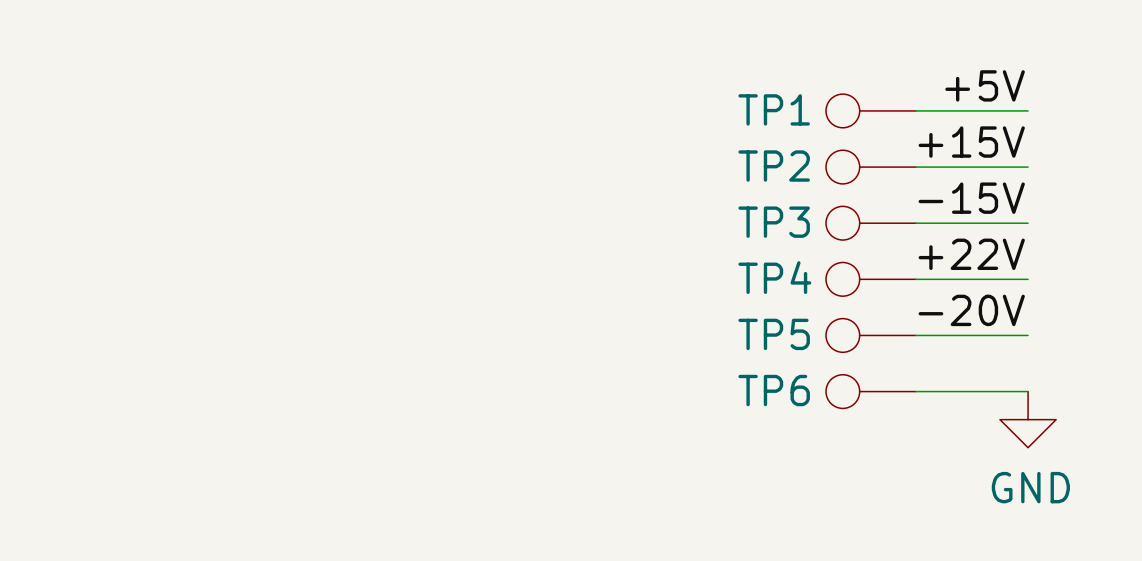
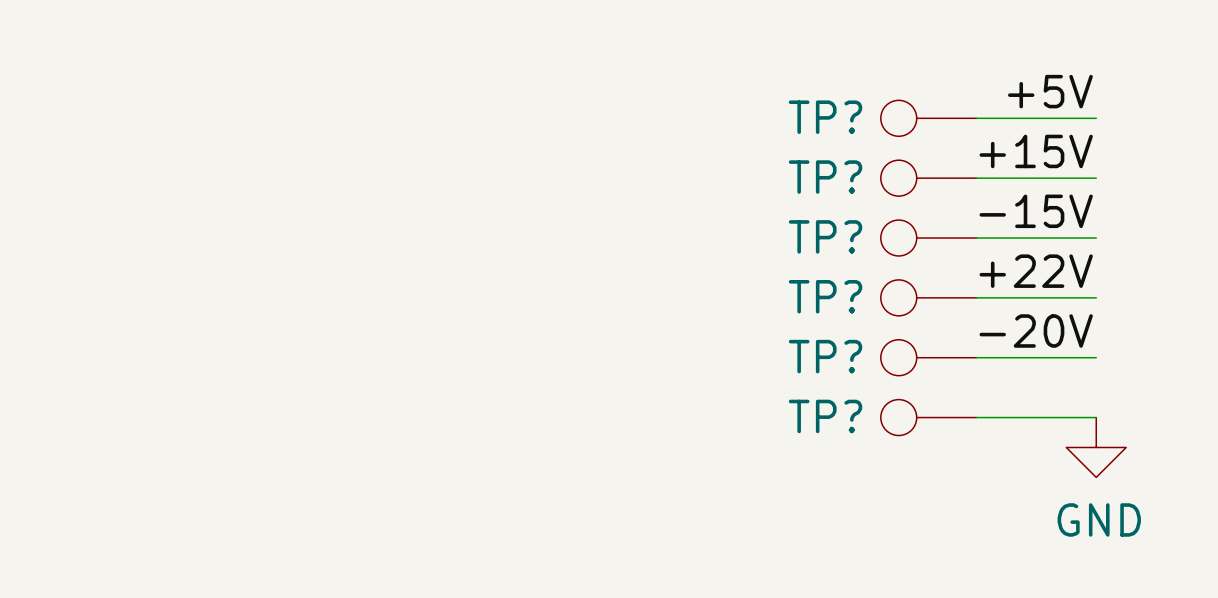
TP1 name: TP1 (774, 109) -> TP? (825, 117)
TP2 name: TP2 (774, 166) -> TP? (825, 177)
TP3 name: TP3 (774, 222) -> TP? (825, 236)
TP4 name: TP4 (774, 277) -> TP? (825, 296)
TP5 name: TP5 (774, 334) -> TP? (825, 356)
TP6 name: TP6 (774, 390) -> TP? (825, 416)

